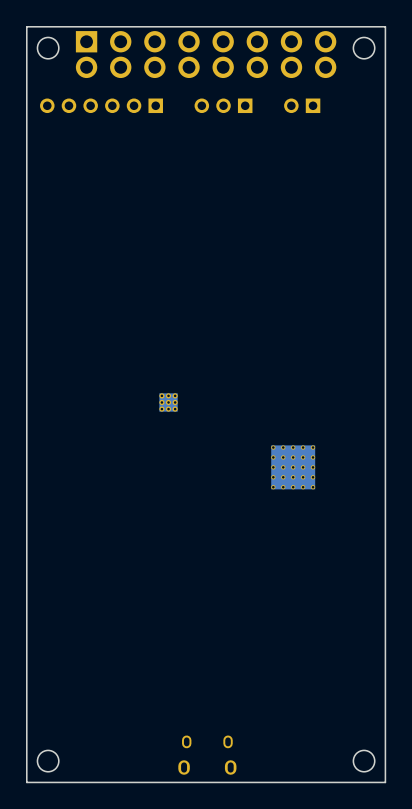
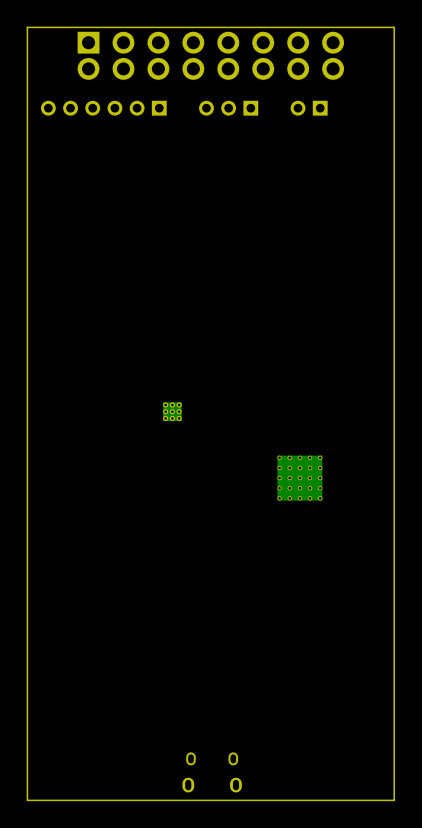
round board edge: [37, 37, 60, 60] -> none
round board edge: [352, 37, 376, 60] -> none
round board edge: [37, 749, 60, 773] -> none
round board edge: [352, 749, 376, 773] -> none

